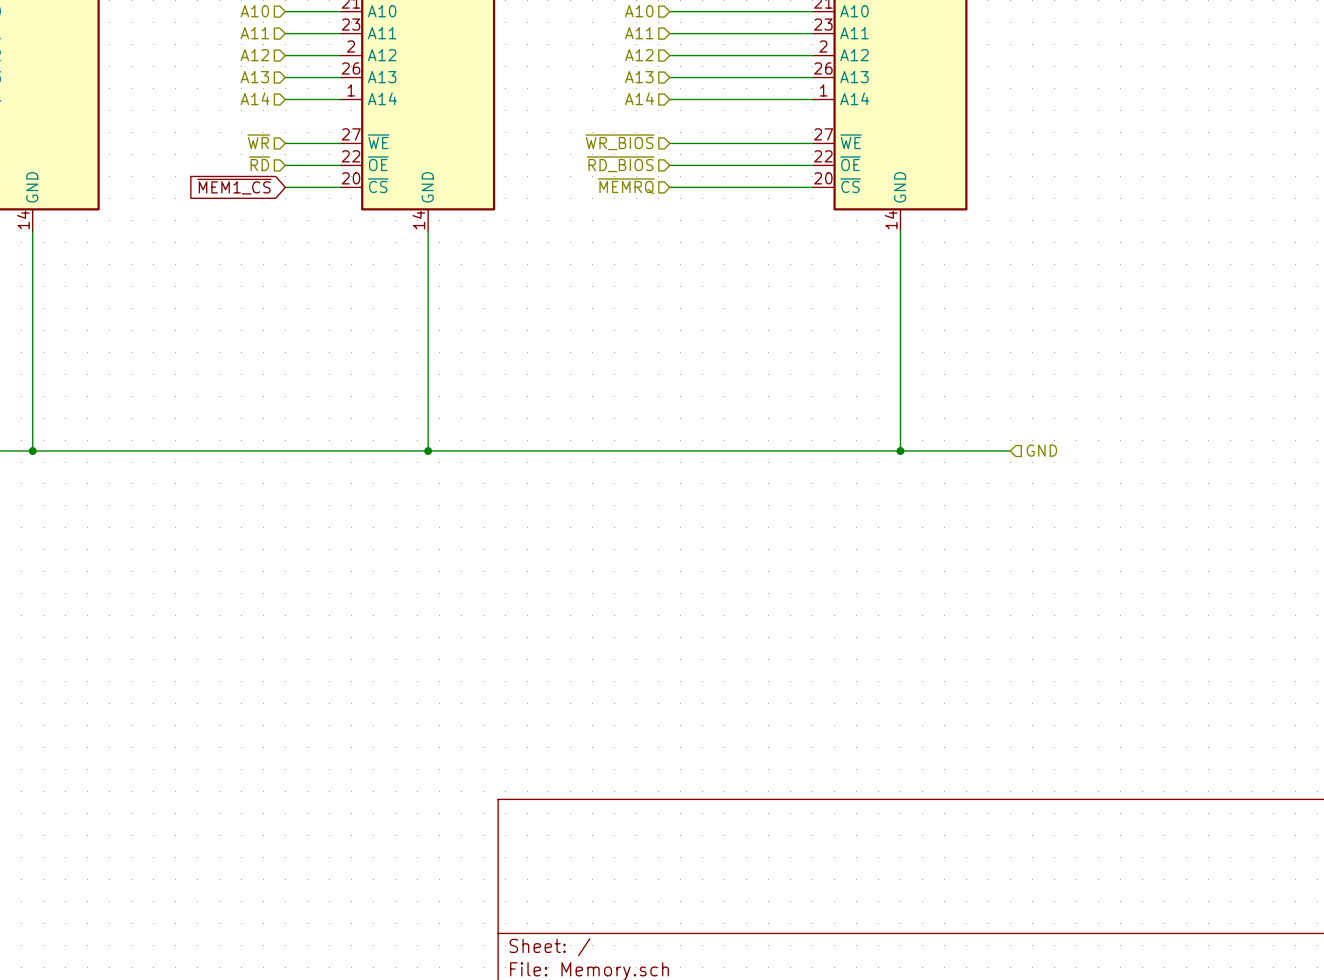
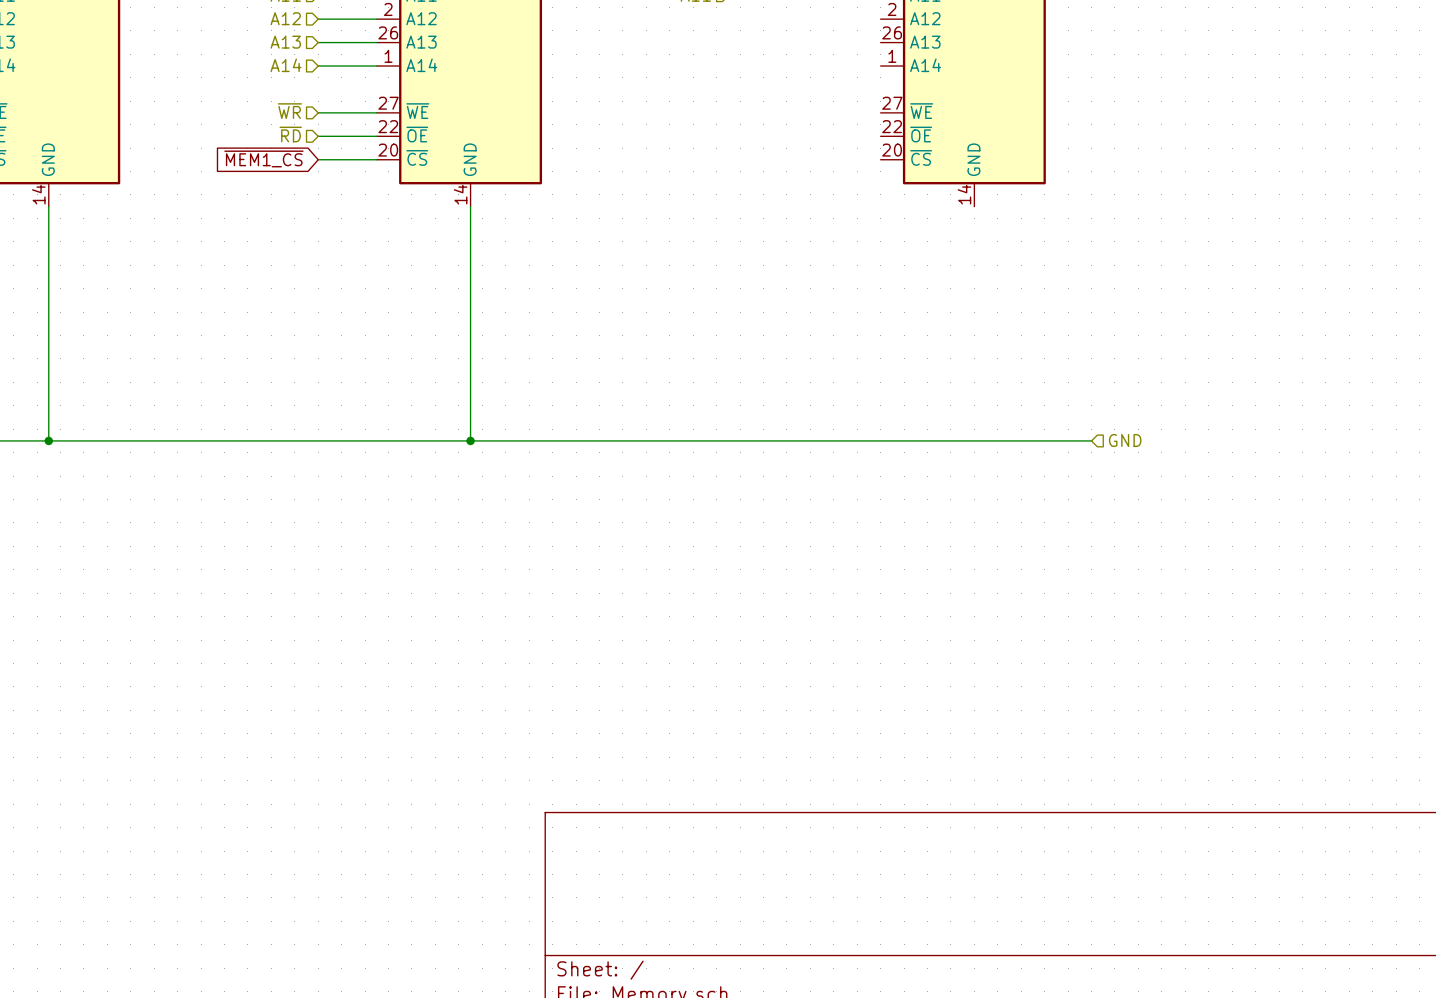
hierarchical label: A12 (639, 55) -> none
wire: (669, 55) (812, 55) -> none
hierarchical label: A13 (639, 77) -> none
wire: (669, 77) (812, 77) -> none
hierarchical label: A14 (639, 98) -> none
wire: (669, 99) (812, 99) -> none
hierarchical label: ~{WR_BIOS} (619, 142) -> none
wire: (669, 143) (812, 143) -> none
hierarchical label: ~{RD_BIOS} (620, 164) -> none
wire: (669, 165) (812, 165) -> none
hierarchical label: ~{MEMRQ} (626, 186) -> none
wire: (669, 187) (812, 187) -> none
wire: (900, 231) (900, 451) -> none
junction: (900, 451) -> none

